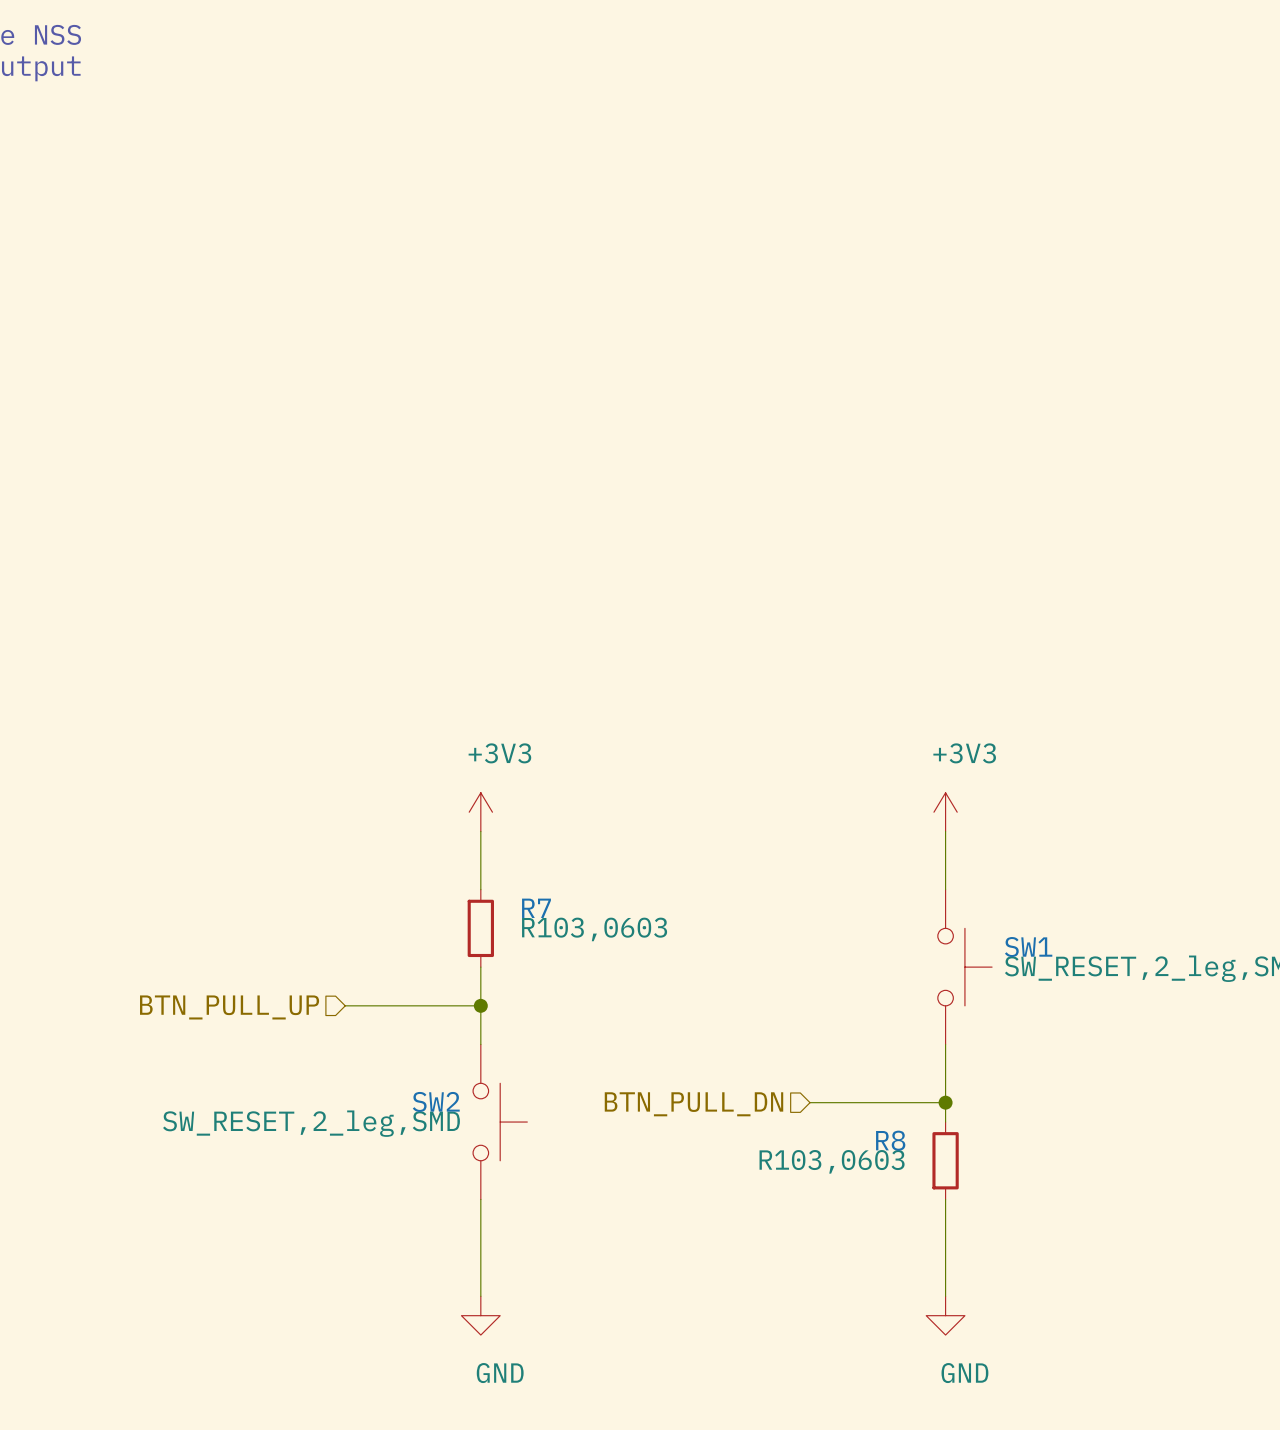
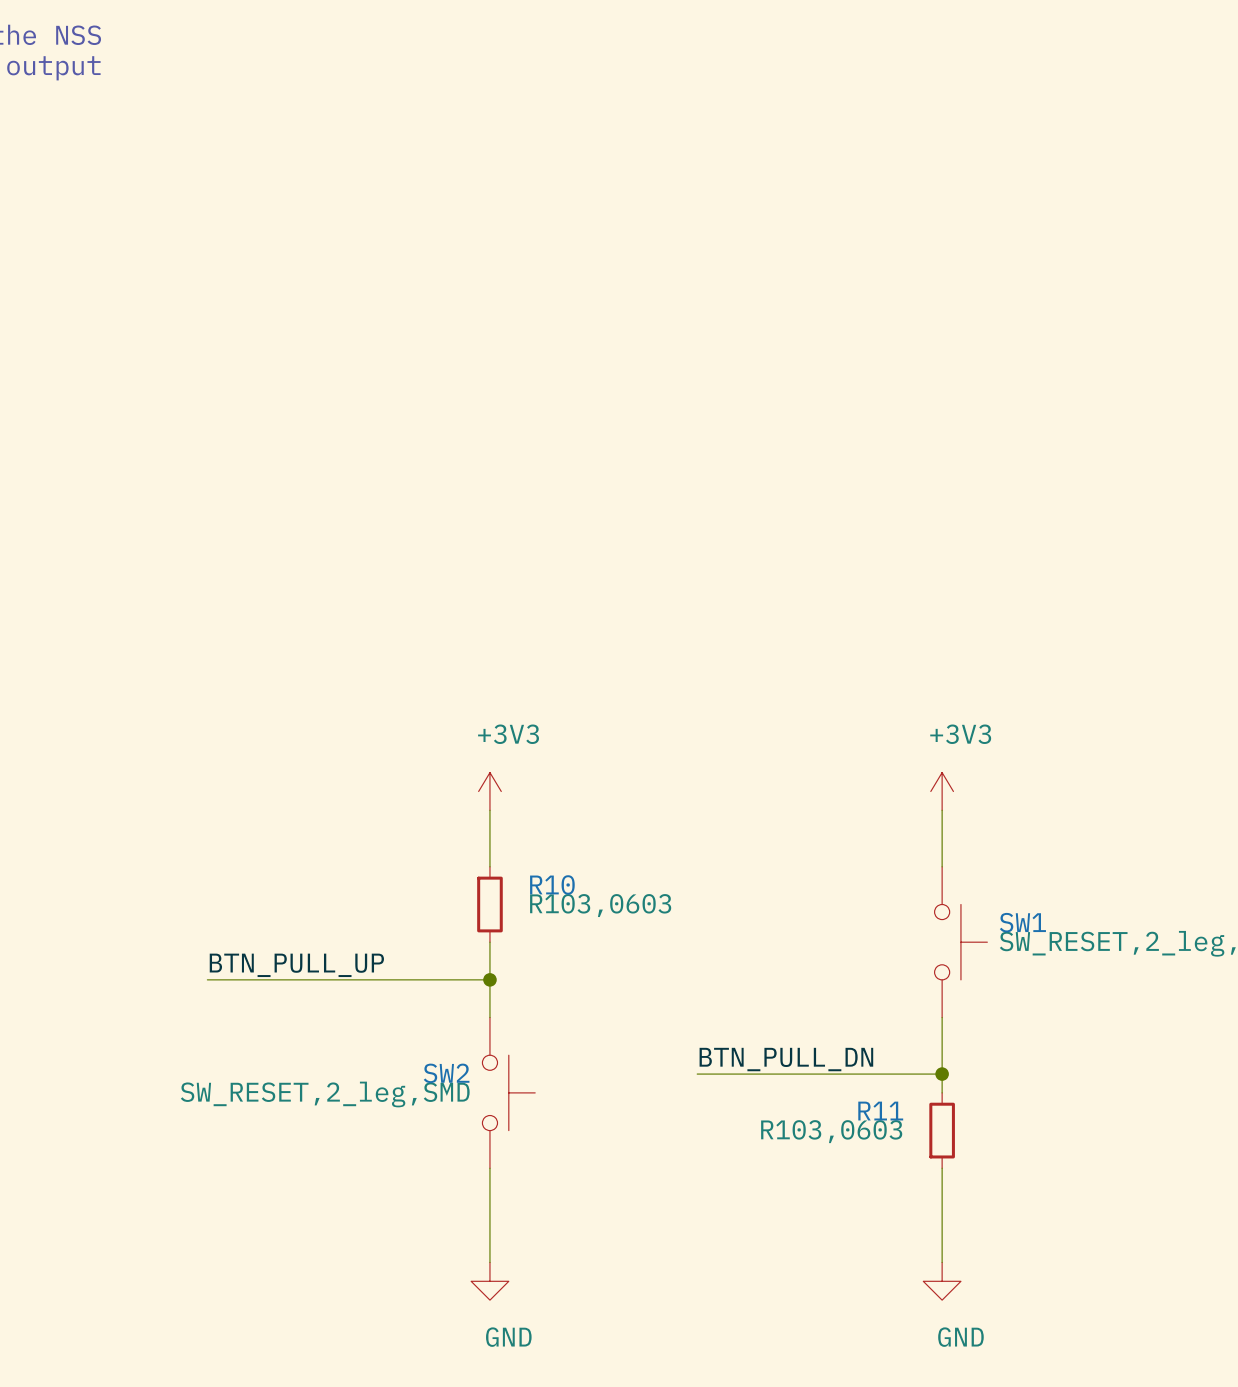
R7 name: R7 (536, 908) -> R10 (552, 884)
label: none -> BTN_PULL_UP (296, 965)
wire: none -> (207, 979) (358, 979)
hierarchical label: BTN_PULL_UP (229, 1007) -> none
label: none -> BTN_PULL_DN (786, 1059)
wire: none -> (697, 1074) (810, 1074)
hierarchical label: BTN_PULL_DN (693, 1104) -> none
R8 name: R8 (890, 1140) -> R11 (880, 1111)

